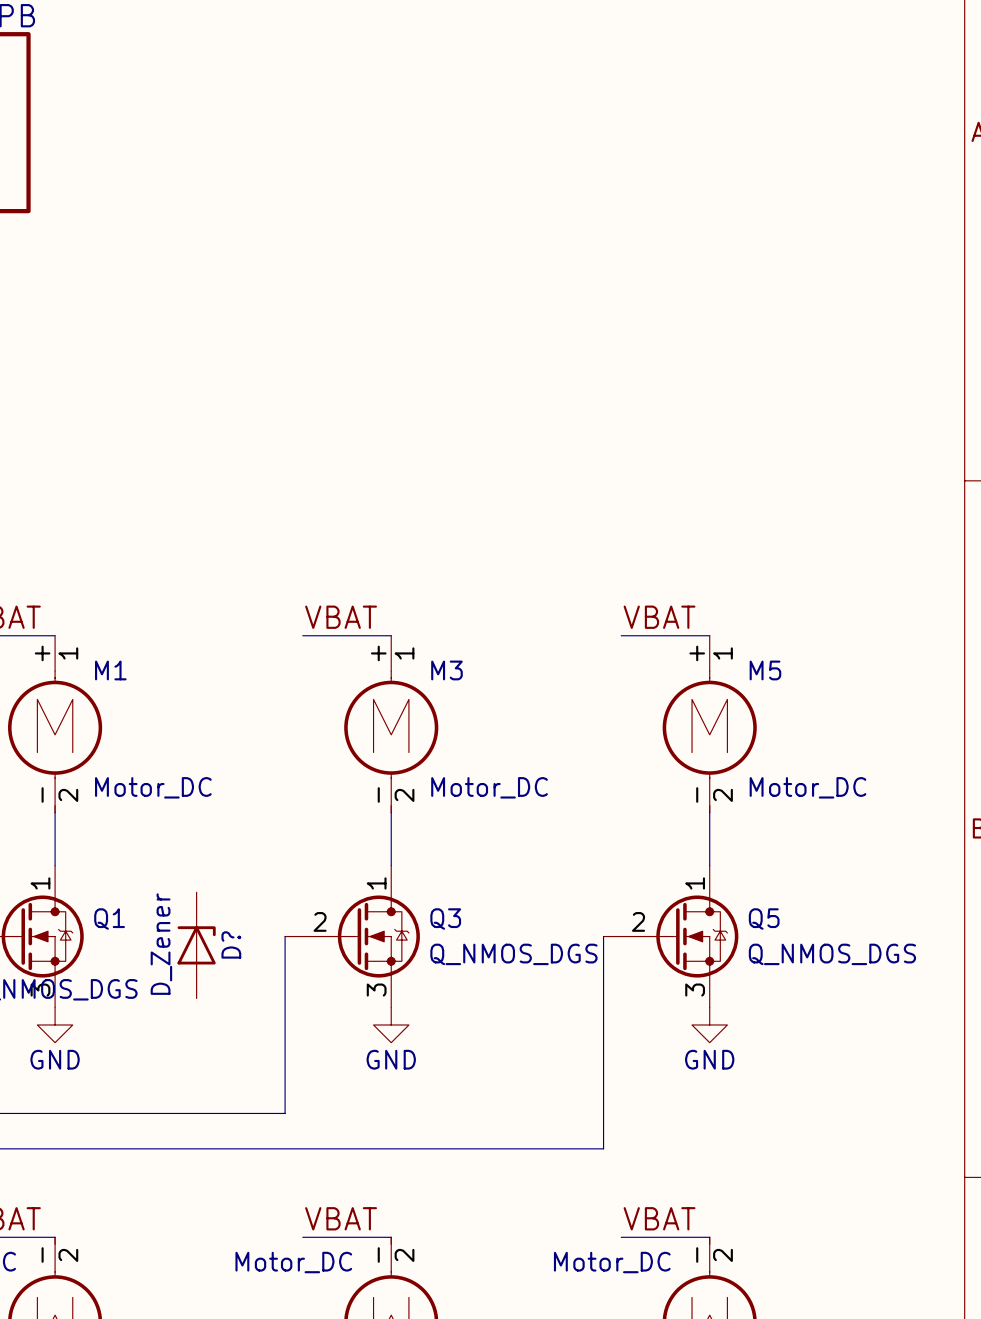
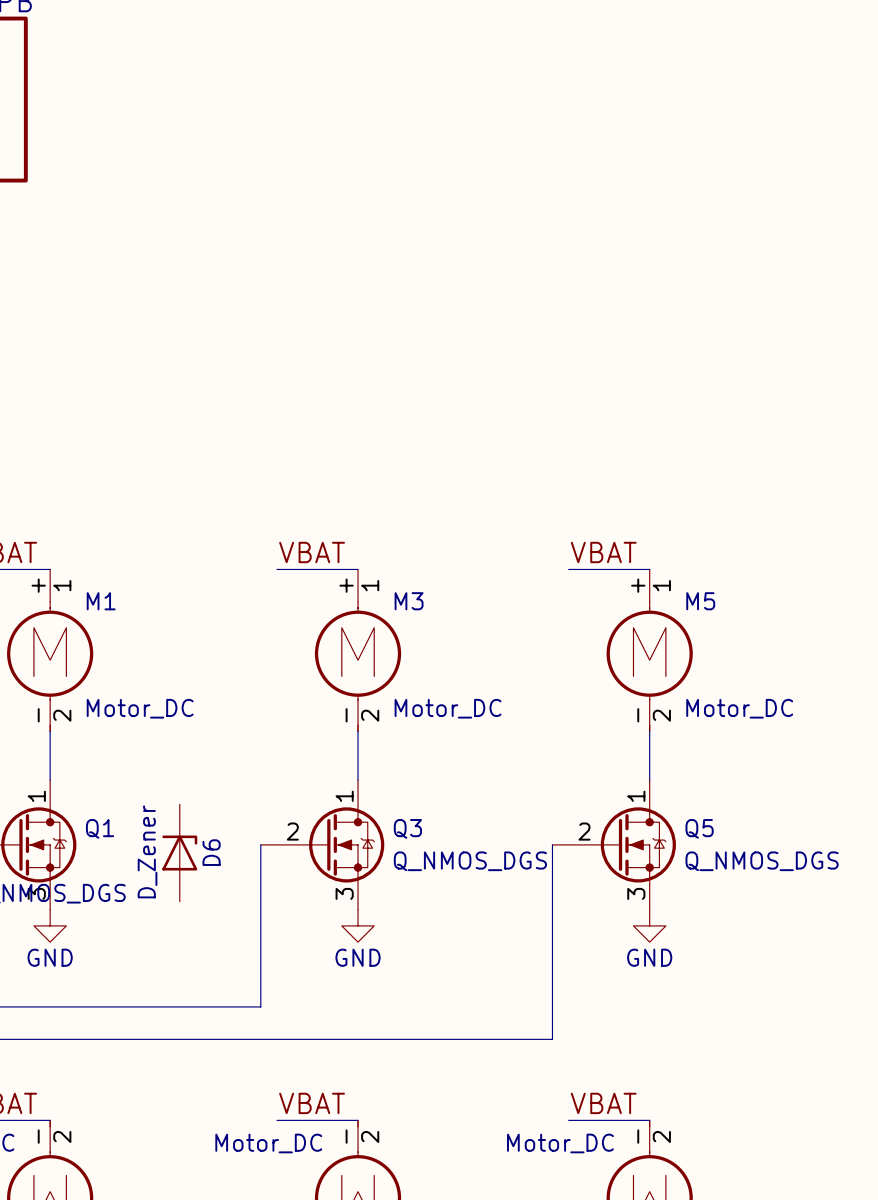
D? name: D? (231, 944) -> D6 (211, 852)

